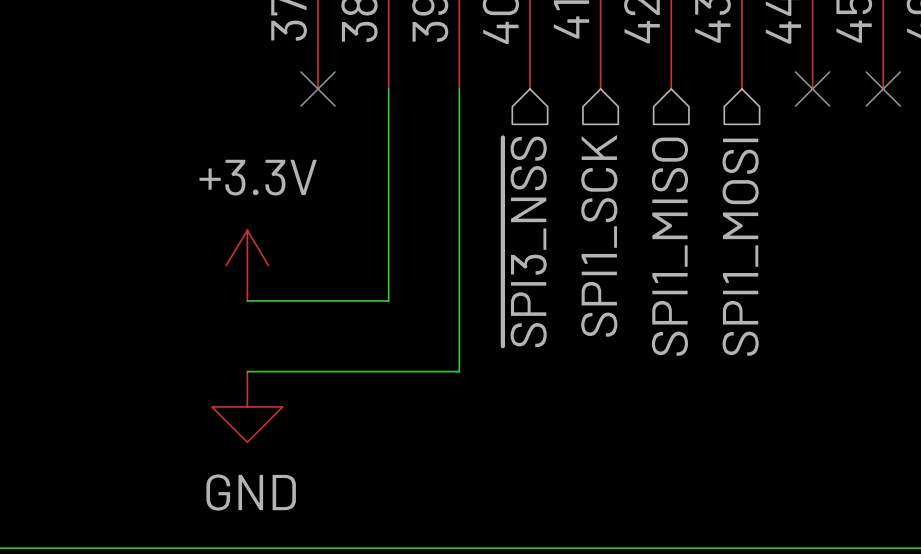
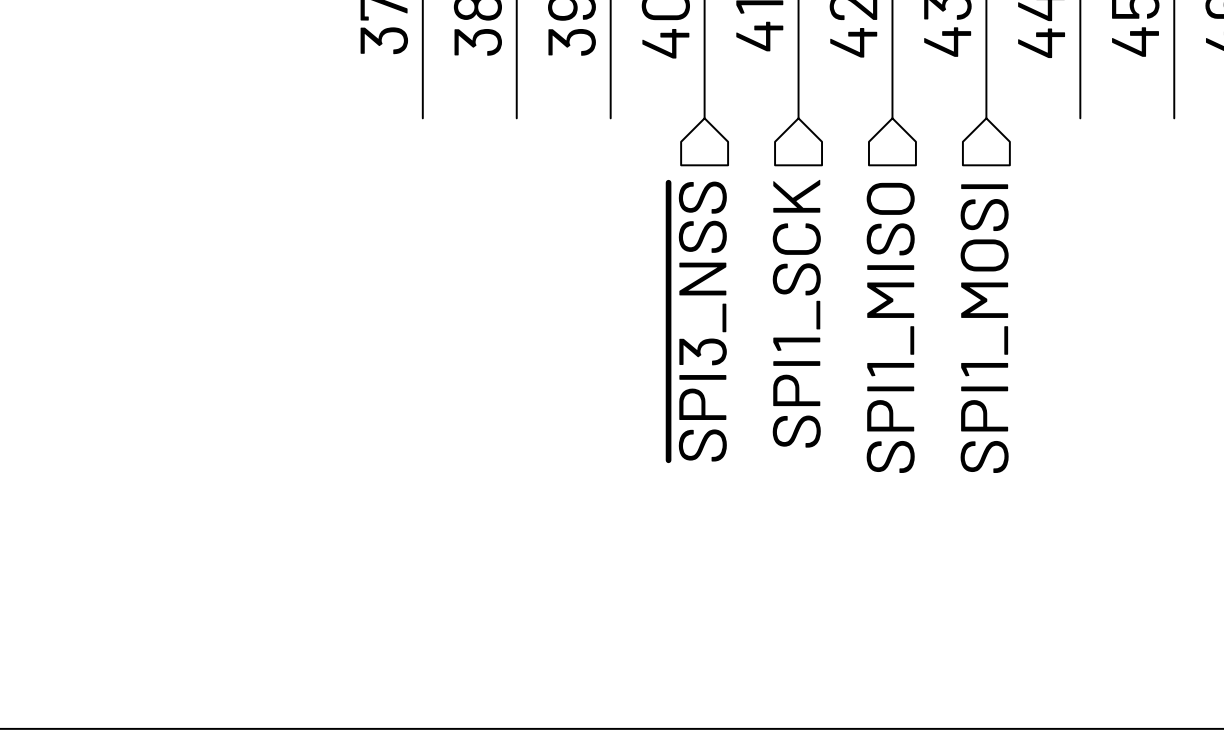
no-connect mark: (318, 89) -> none
wire: (388, 89) (388, 300) (247, 300) -> none
wire: (459, 89) (459, 371) (247, 371) -> none
no-connect mark: (812, 89) -> none
no-connect mark: (883, 89) -> none
power symbol: +3.3V (247, 265) -> none
power symbol: GND (247, 406) -> none

